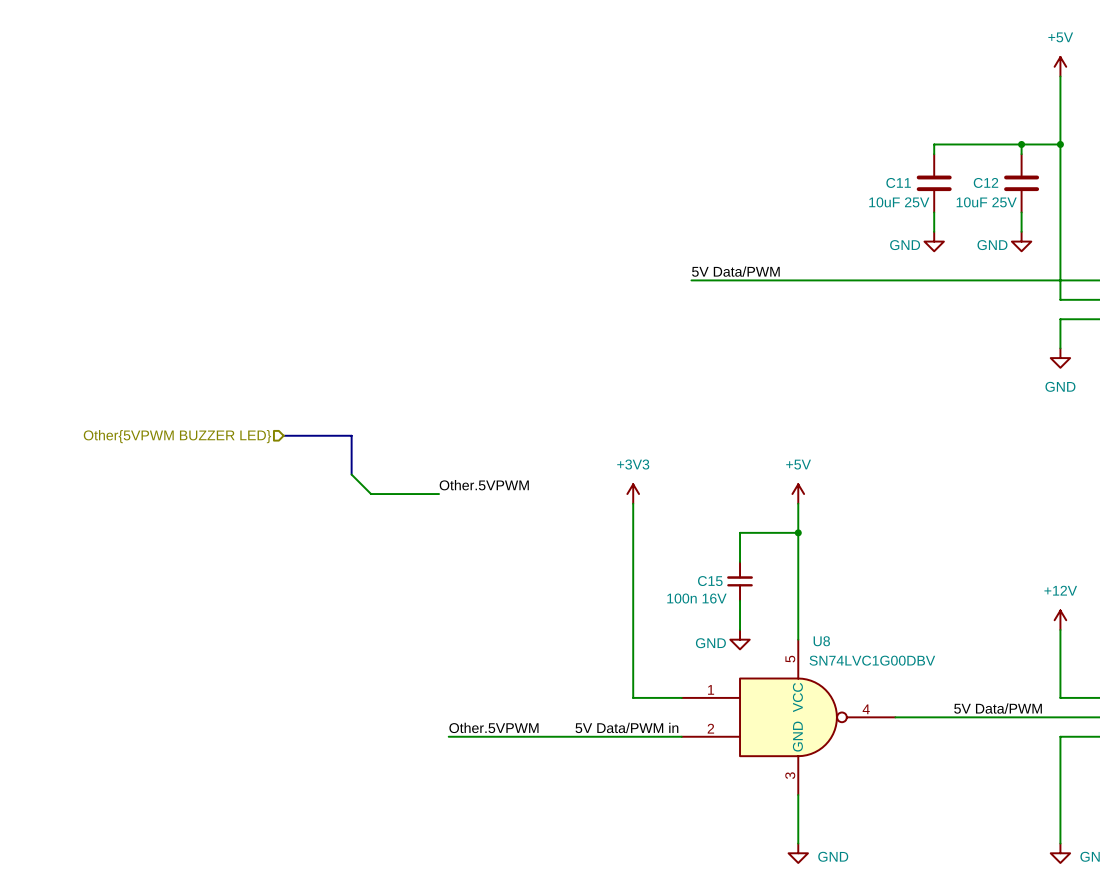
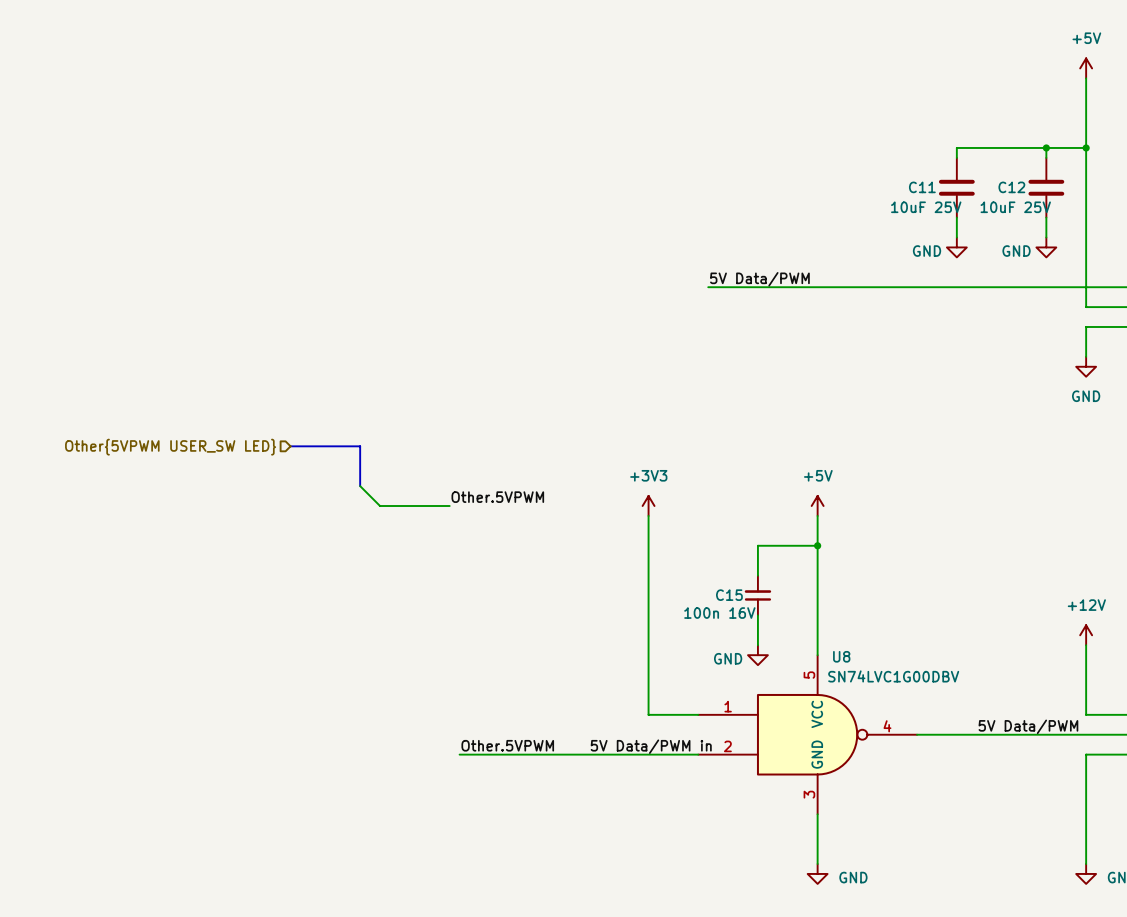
hierarchical label: Other{5VPWM BUZZER LED} (177, 436) -> Other{5VPWM USER_SW LED} (170, 447)

